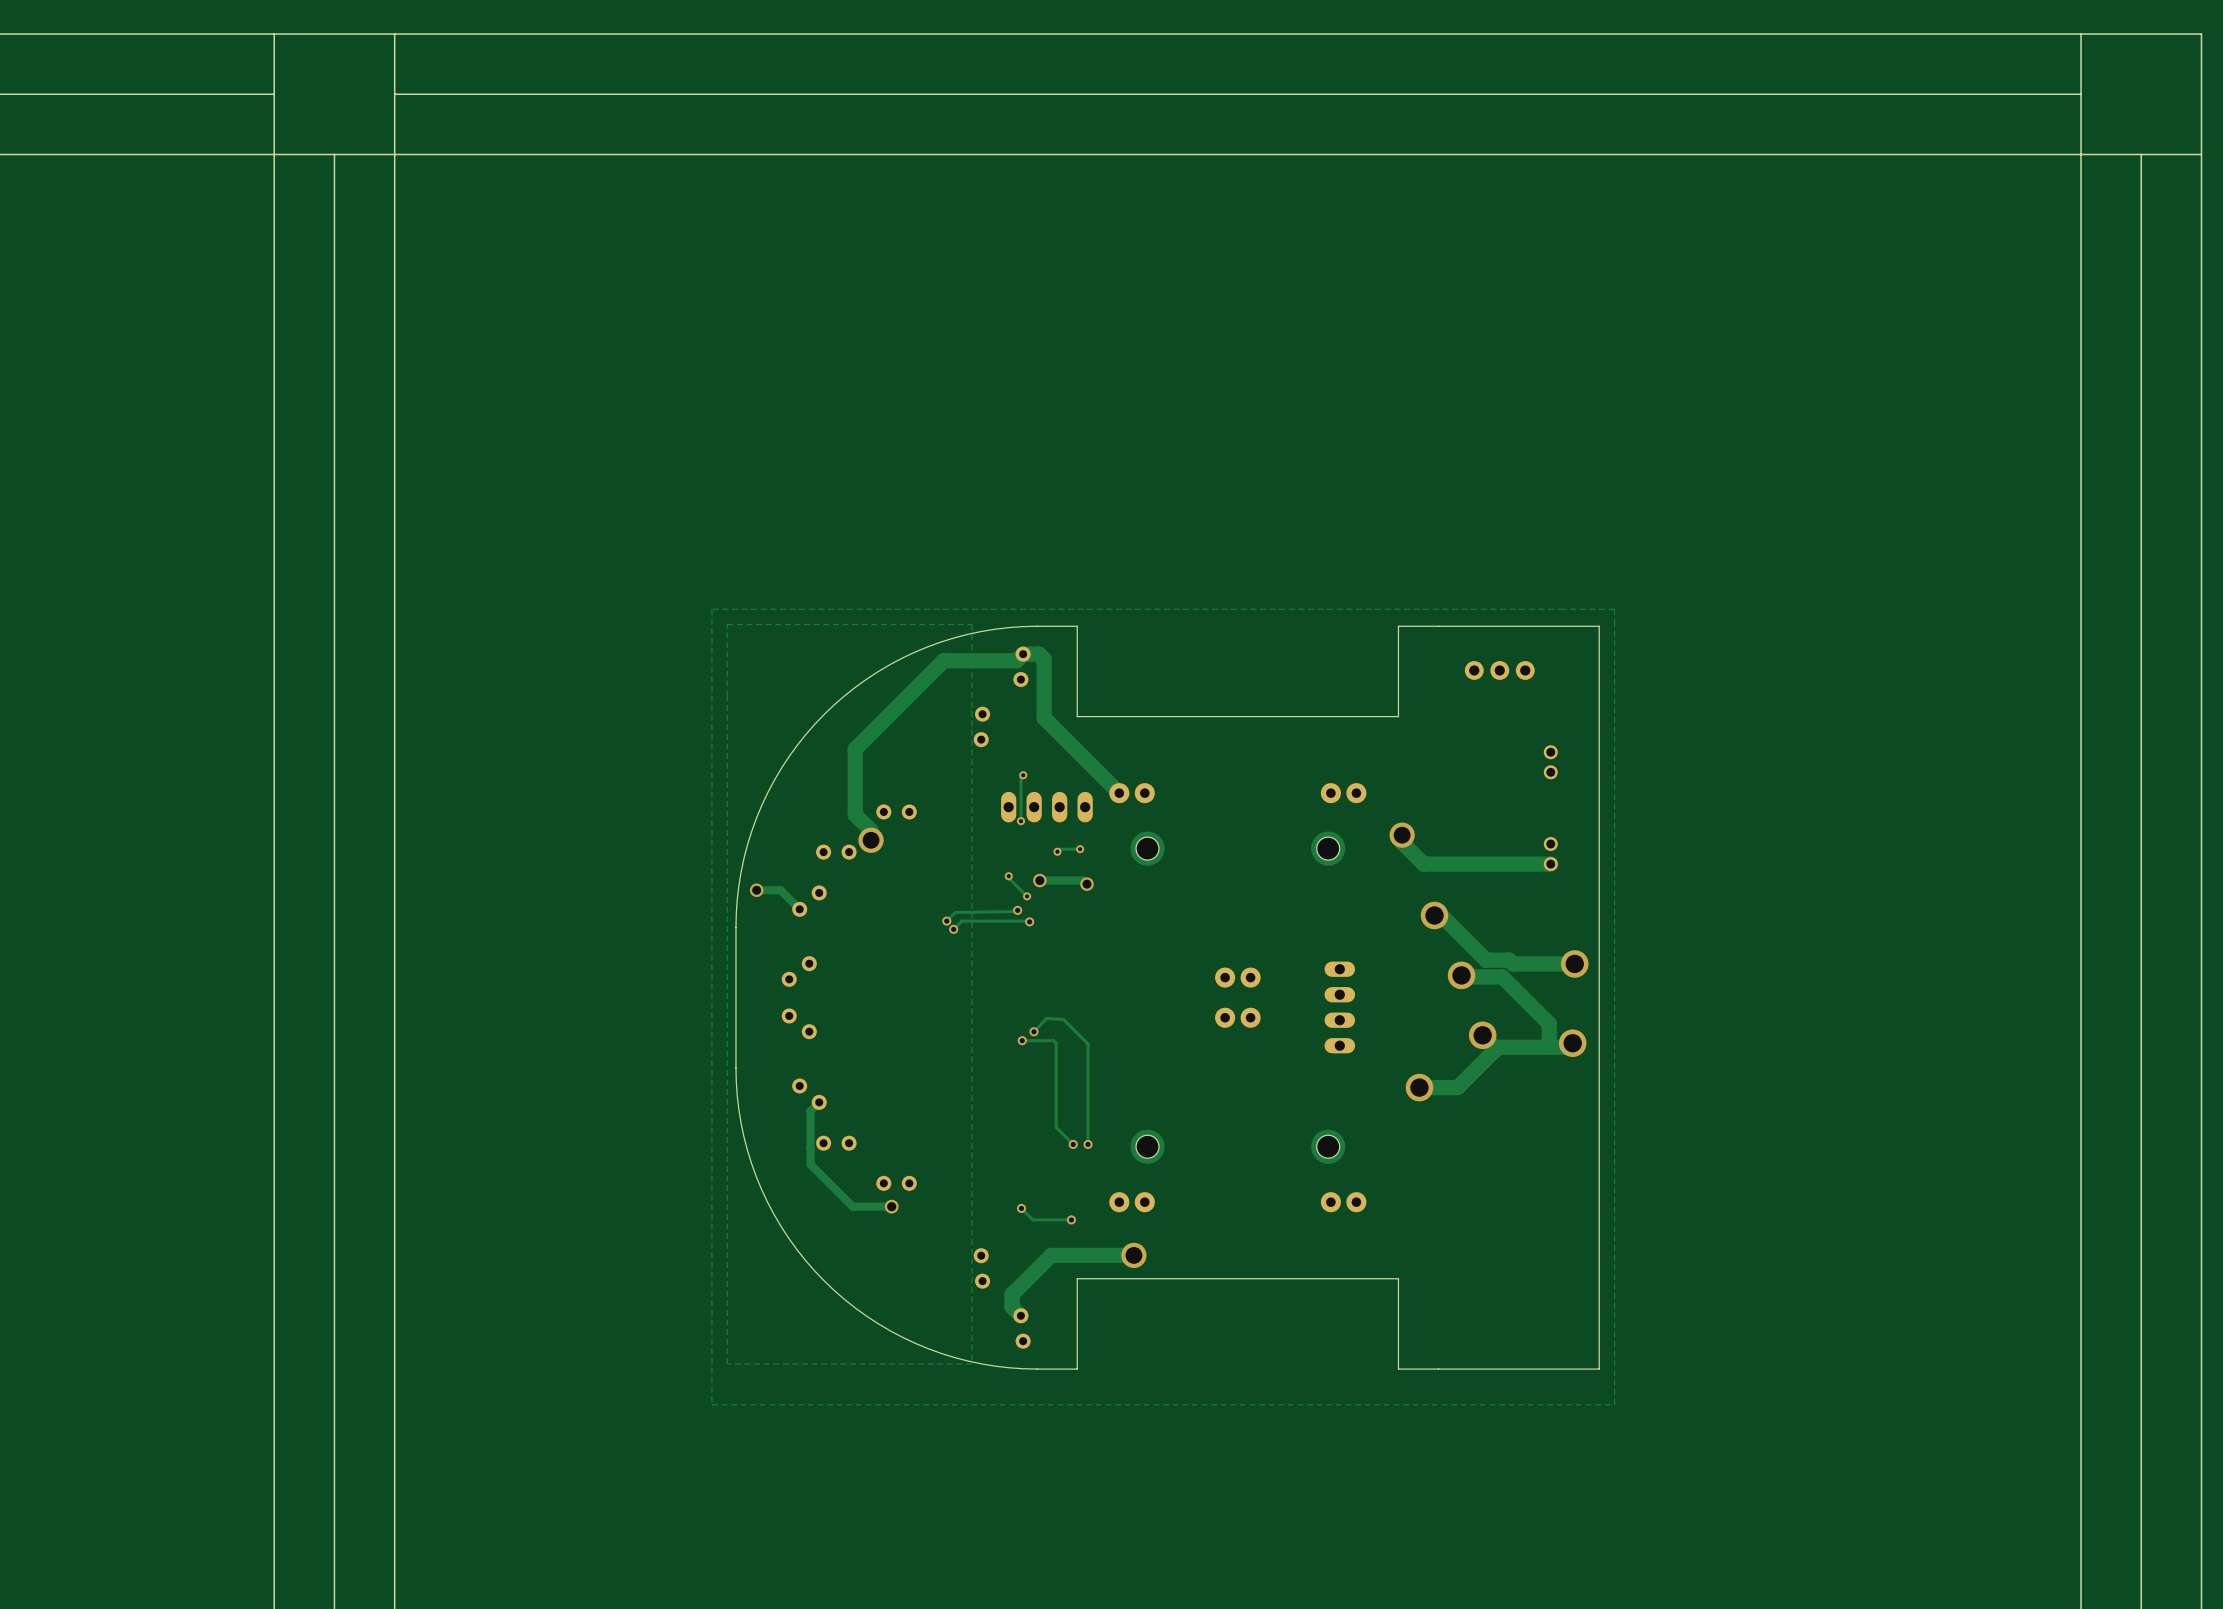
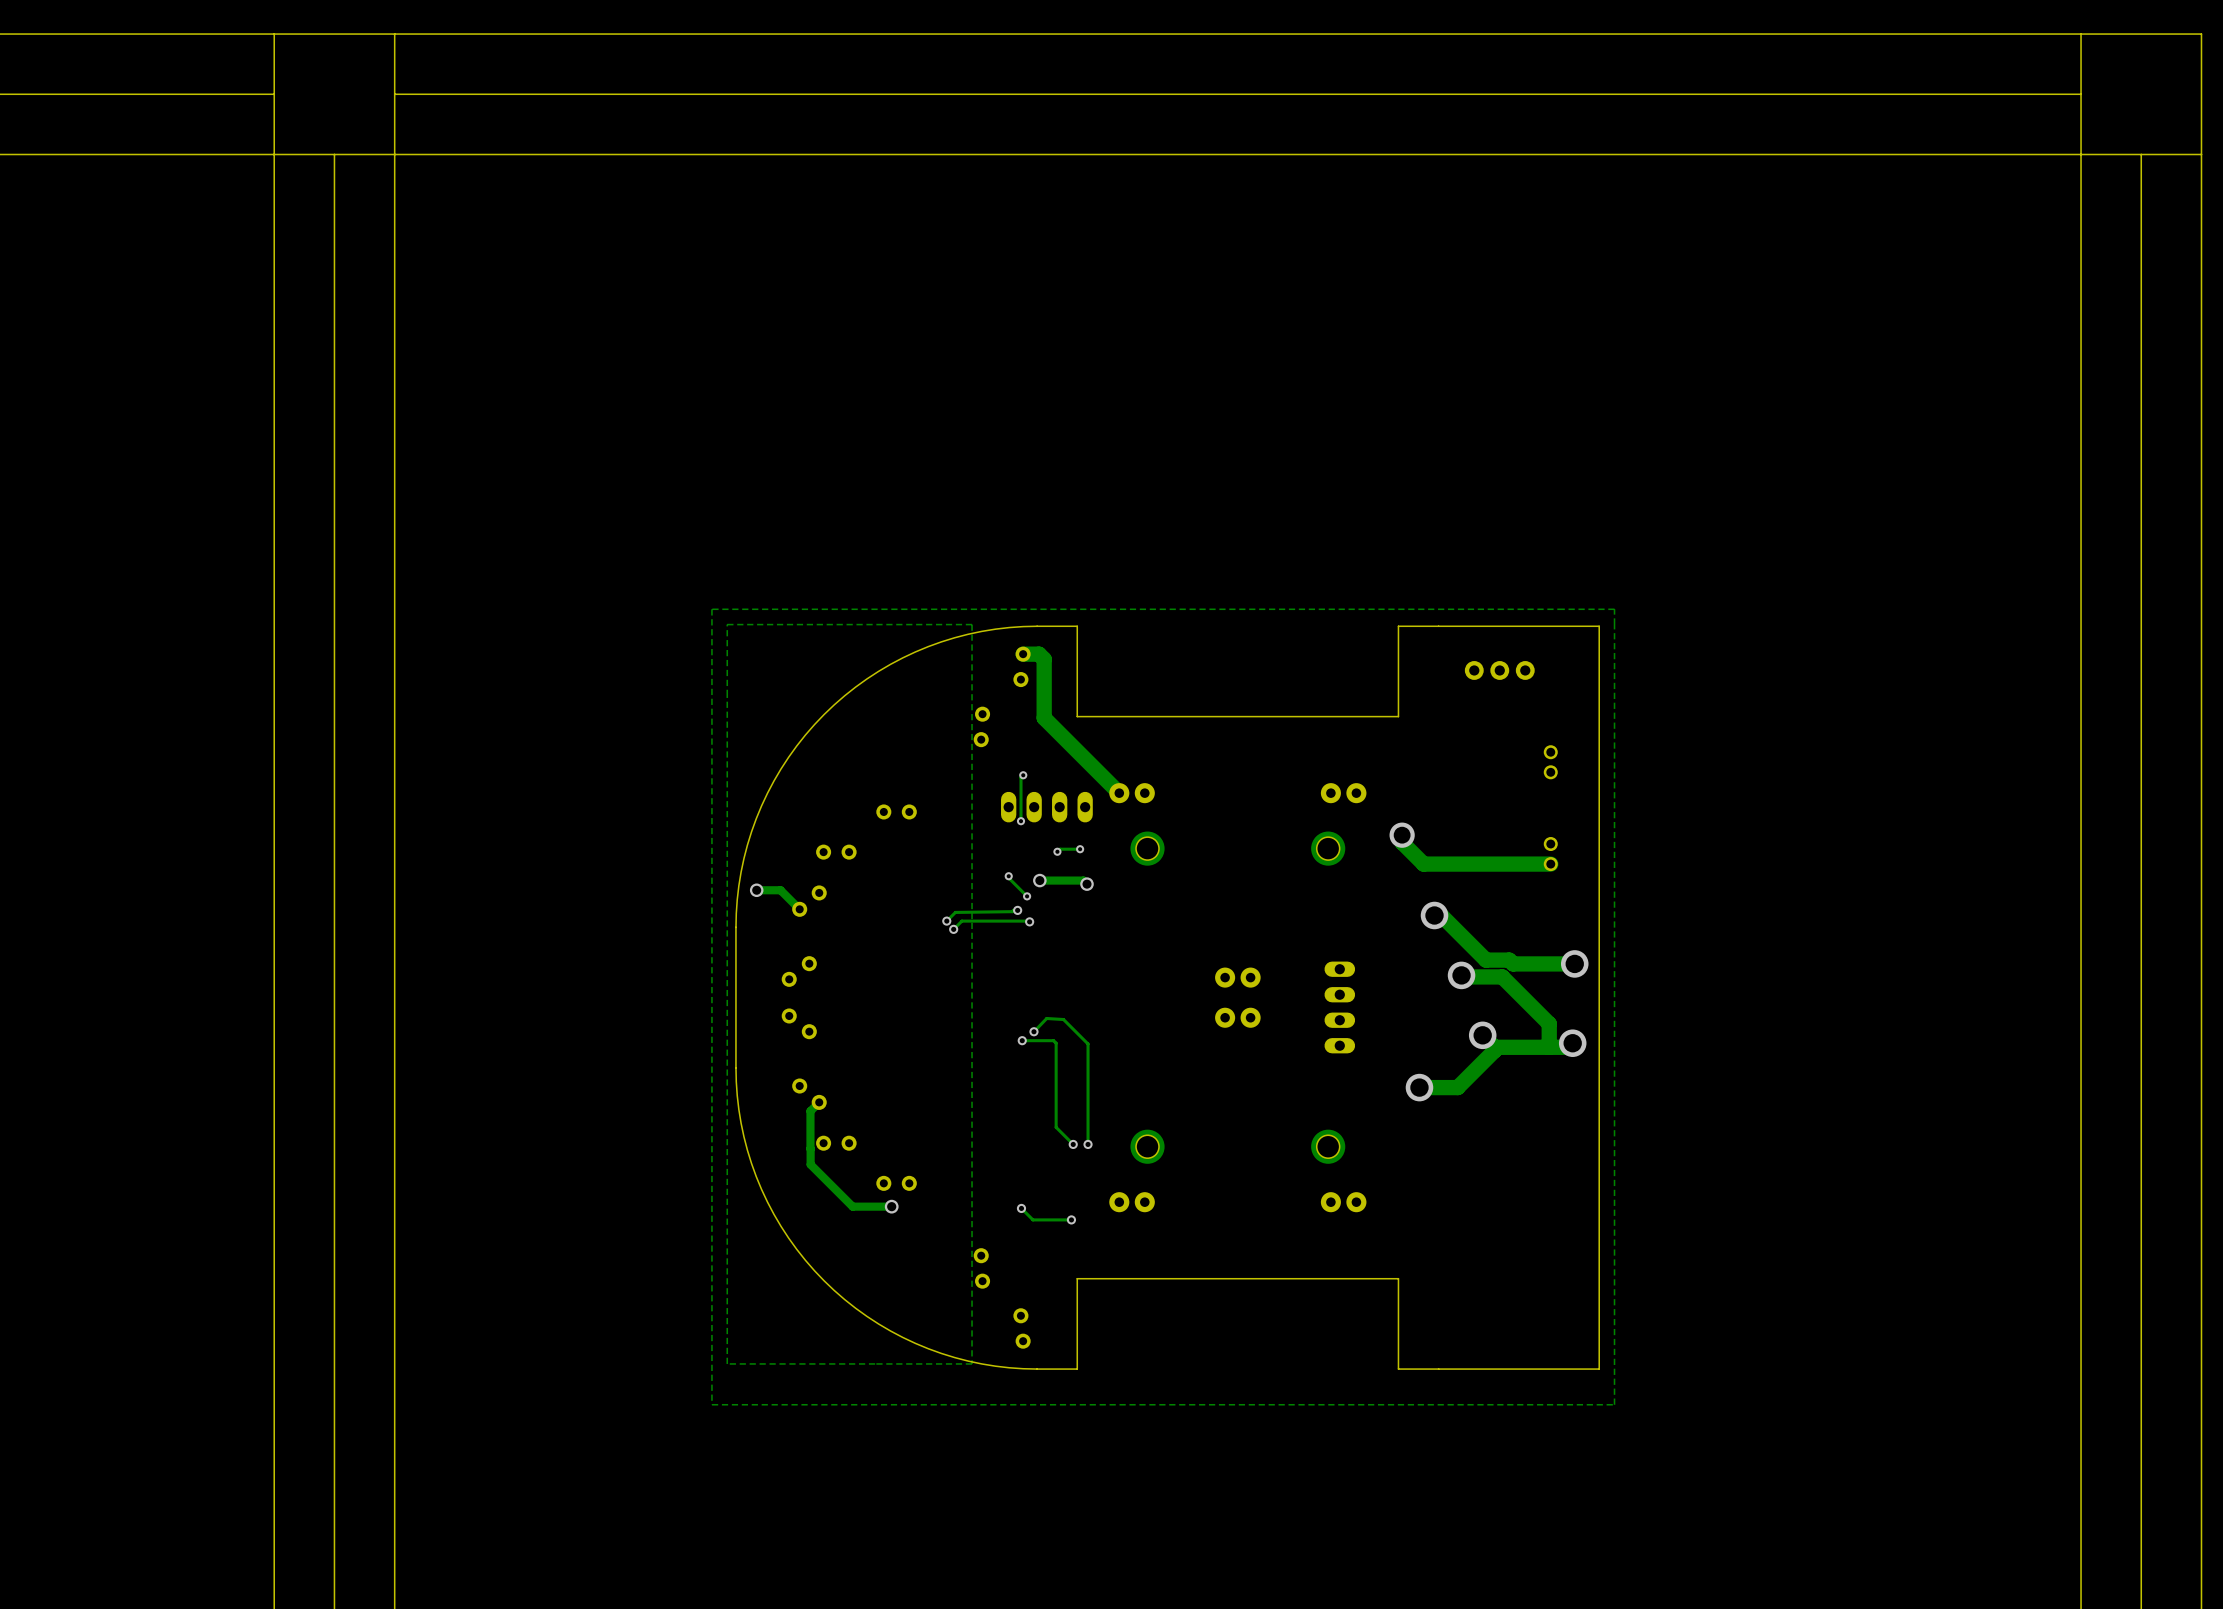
track: (1023, 654) (1016, 660) (943, 660) (855, 749) (855, 814) (871, 830) (871, 840) -> none
via: (871, 840) -> none
track: (1133, 1255) (1051, 1255) (1012, 1294) (1012, 1306) (1020, 1315) -> none
via: (1133, 1255) -> none

